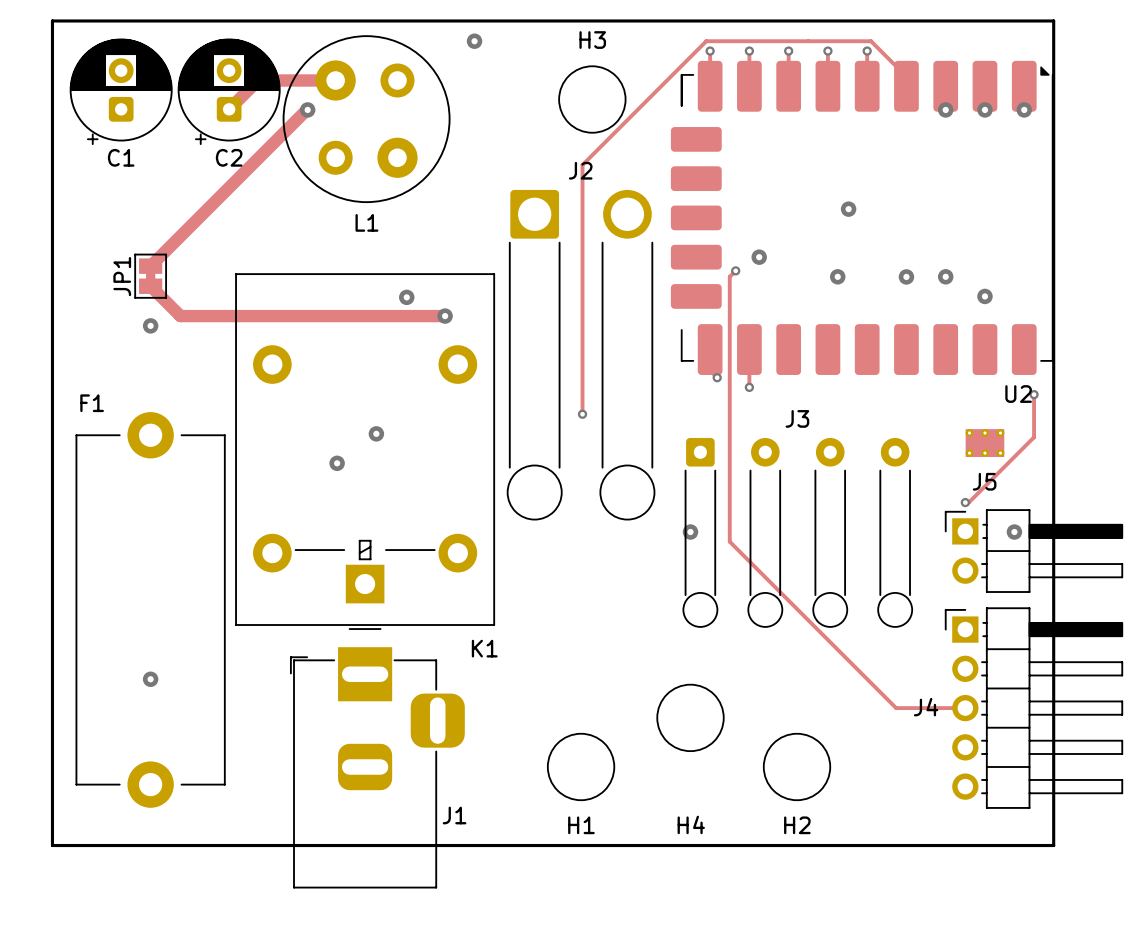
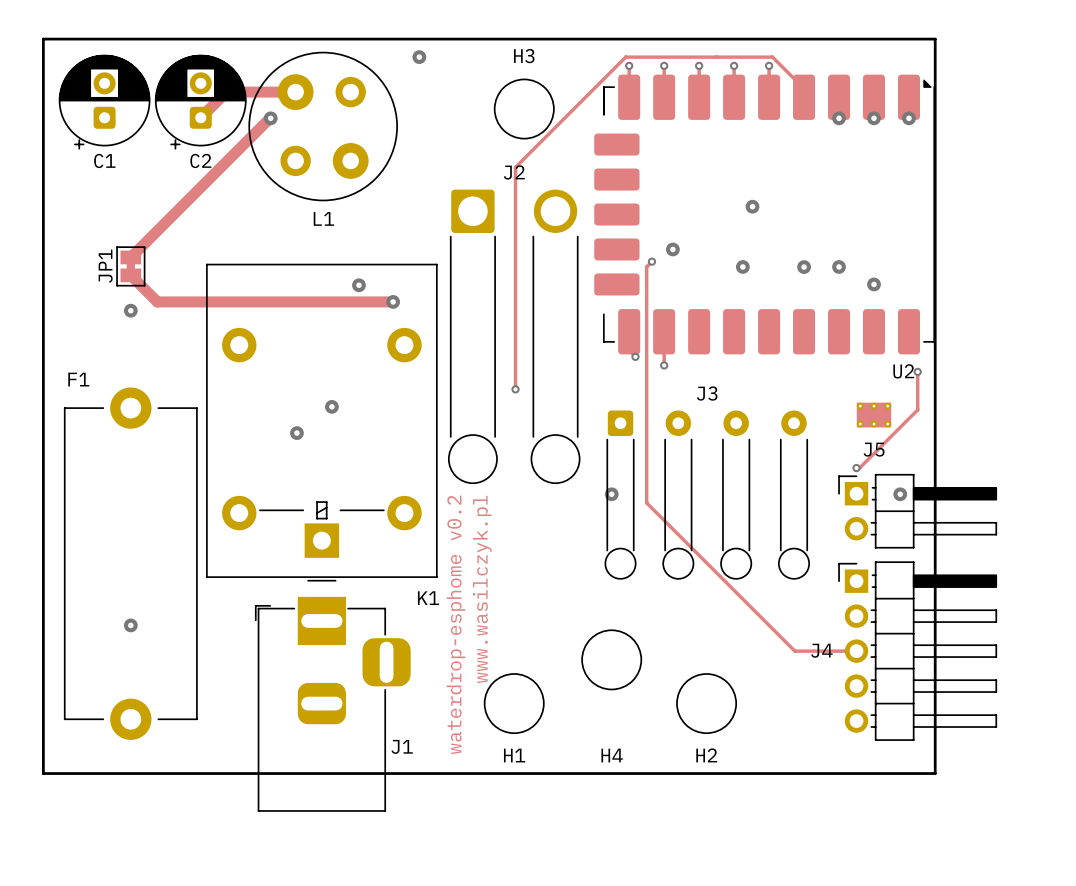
text: none -> www.wasilczyk.pl (482, 589)
text: none -> waterdrop-esphome v0.2 (456, 624)

